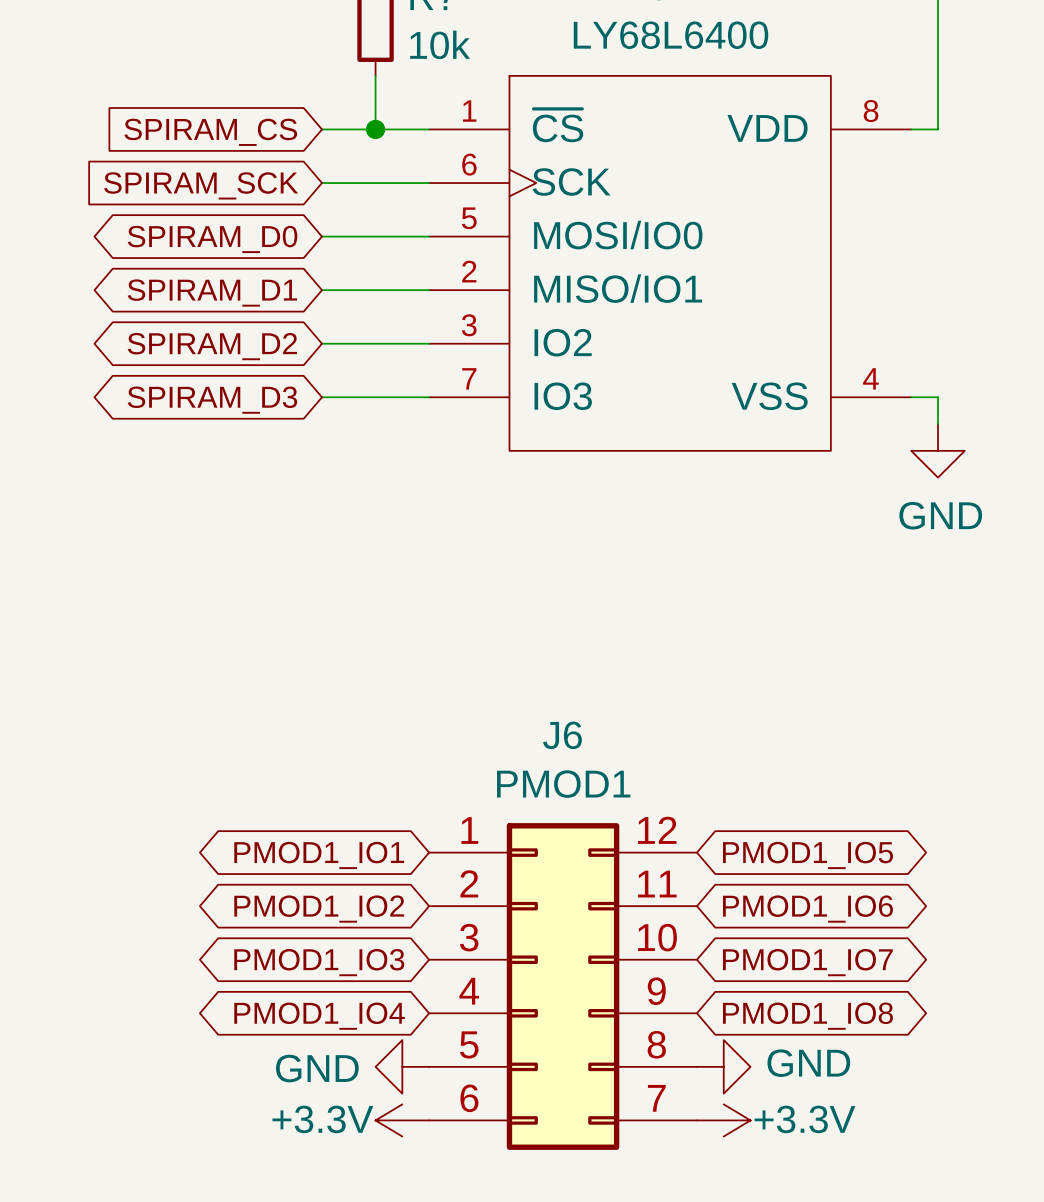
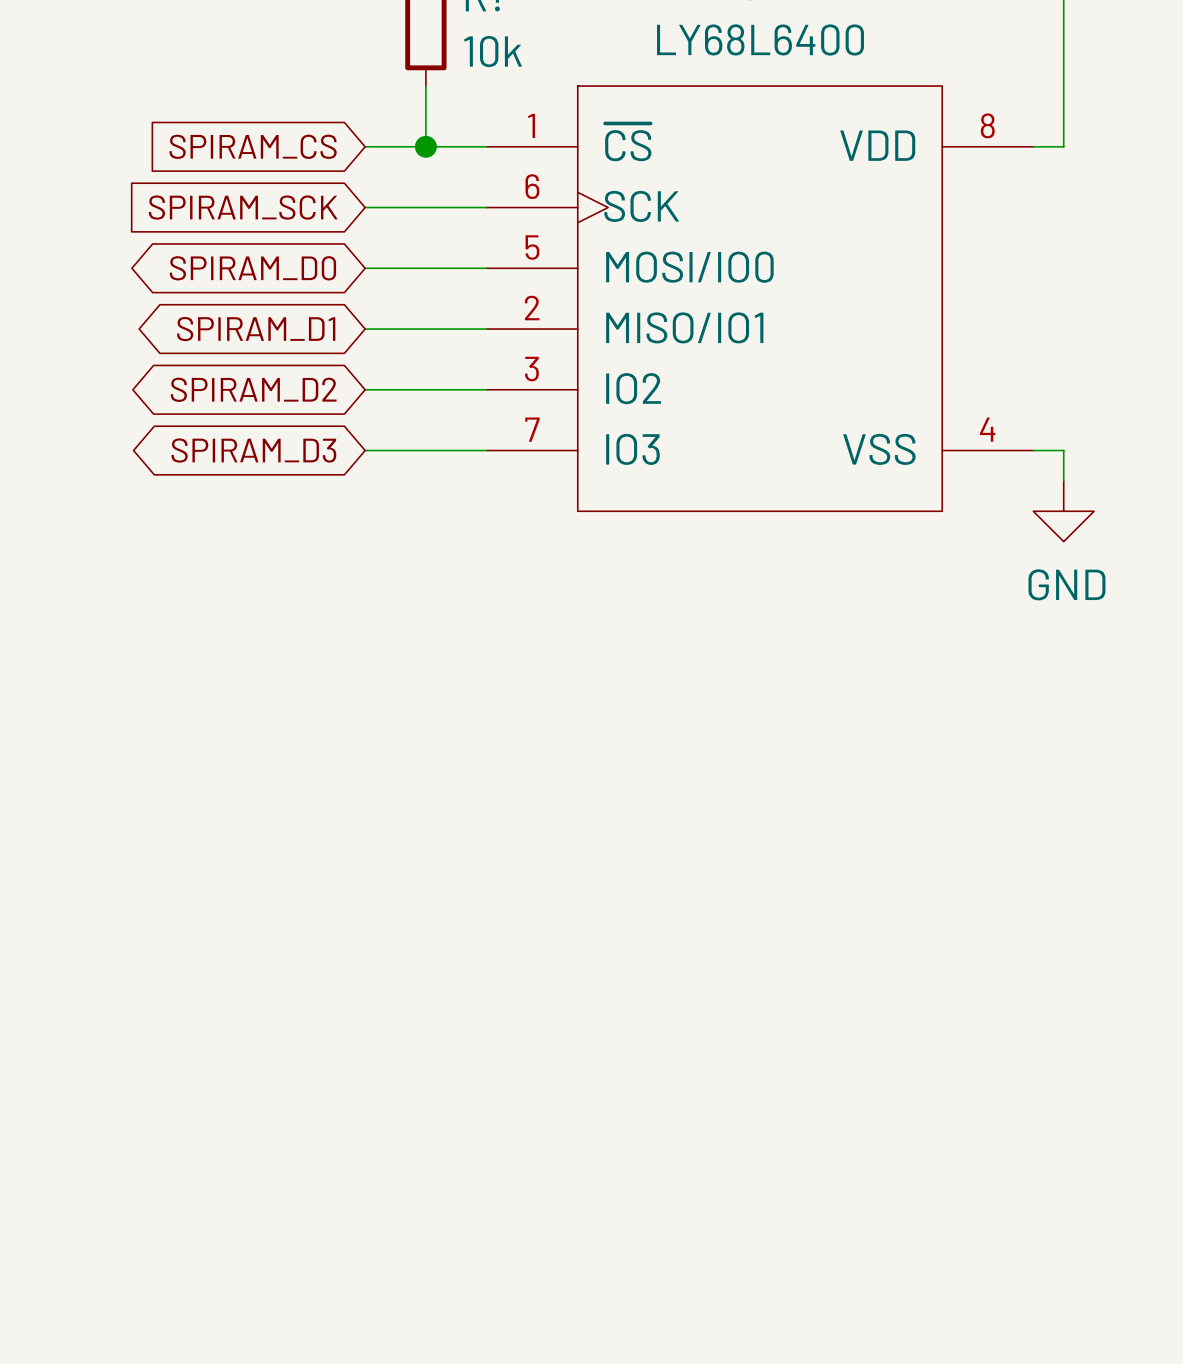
global label: PMOD1_IO1 (319, 855) -> none
global label: PMOD1_IO5 (807, 855) -> none
global label: PMOD1_IO2 (319, 909) -> none
global label: PMOD1_IO6 (807, 909) -> none
global label: PMOD1_IO3 (319, 962) -> none
global label: PMOD1_IO7 (807, 962) -> none
J6: PMOD1 (563, 986) -> none
global label: PMOD1_IO4 (319, 1016) -> none
global label: PMOD1_IO8 (807, 1016) -> none
power symbol: GND (402, 1066) -> none
power symbol: GND (723, 1066) -> none
power symbol: +3.3V (402, 1120) -> none
power symbol: +3.3V (723, 1120) -> none

